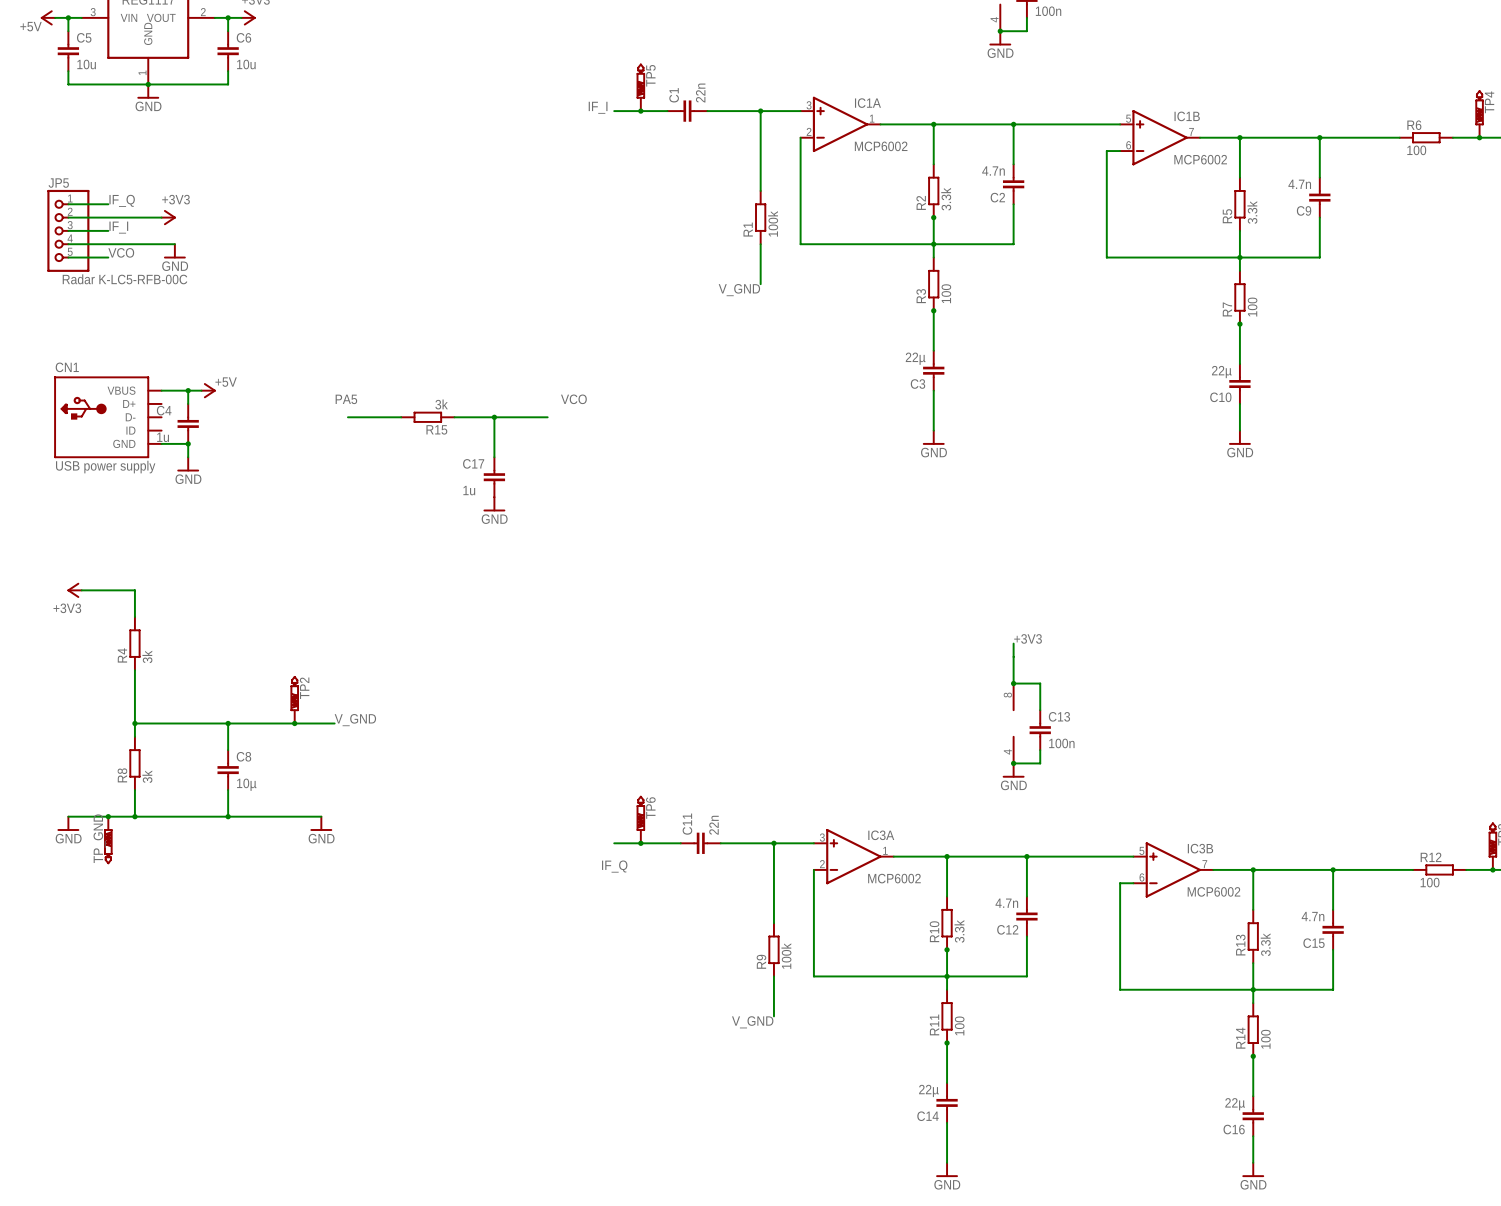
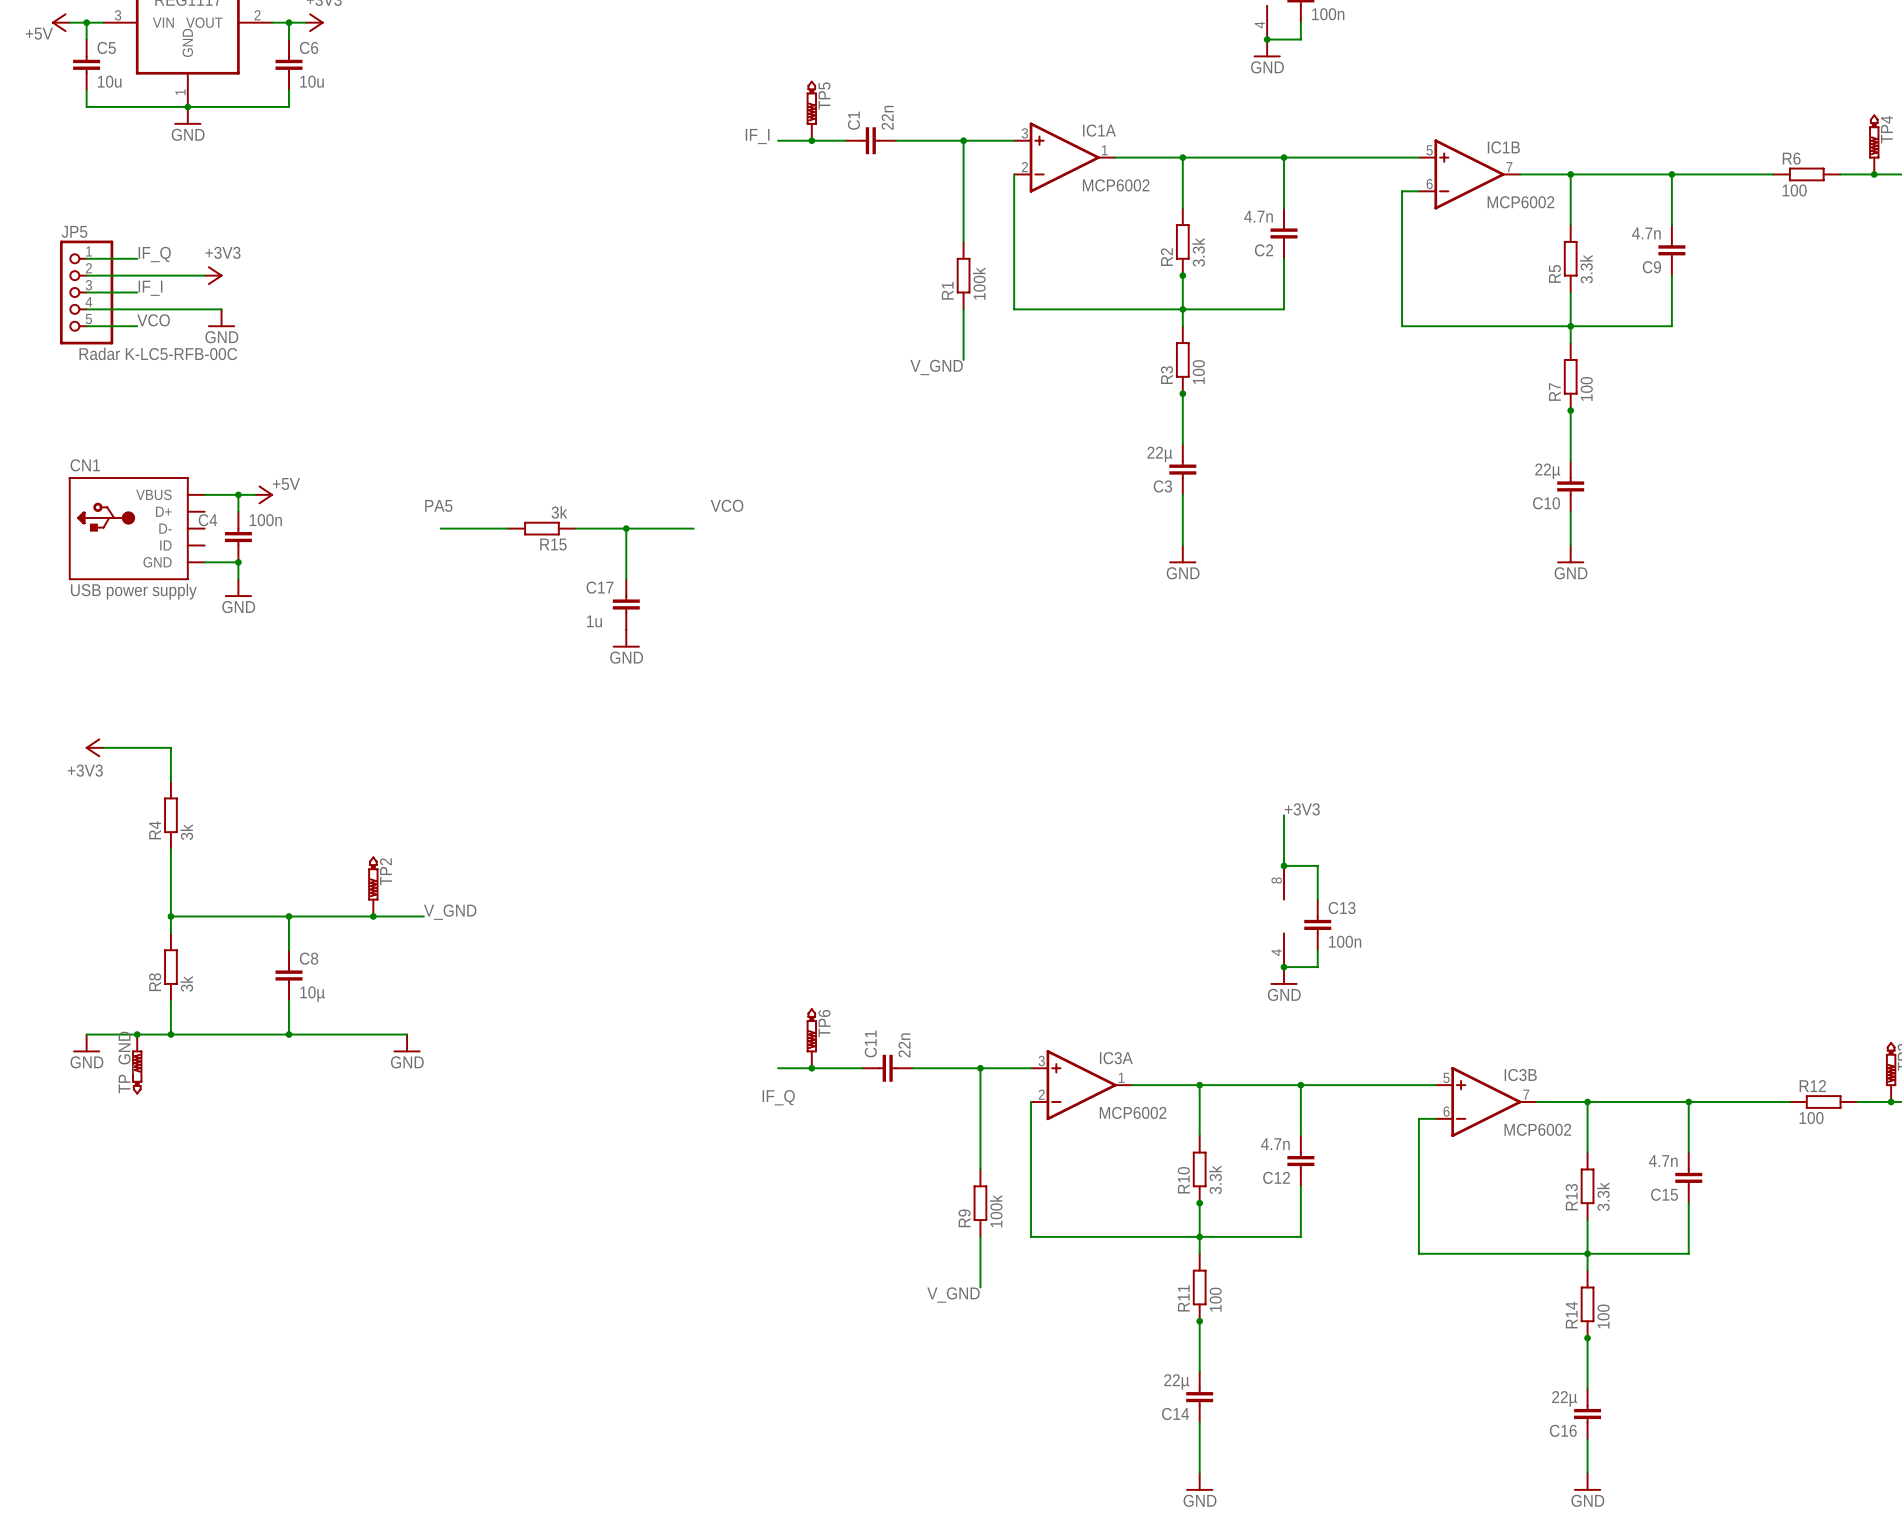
C4 value: 1u (163, 437) -> 100n (265, 520)

